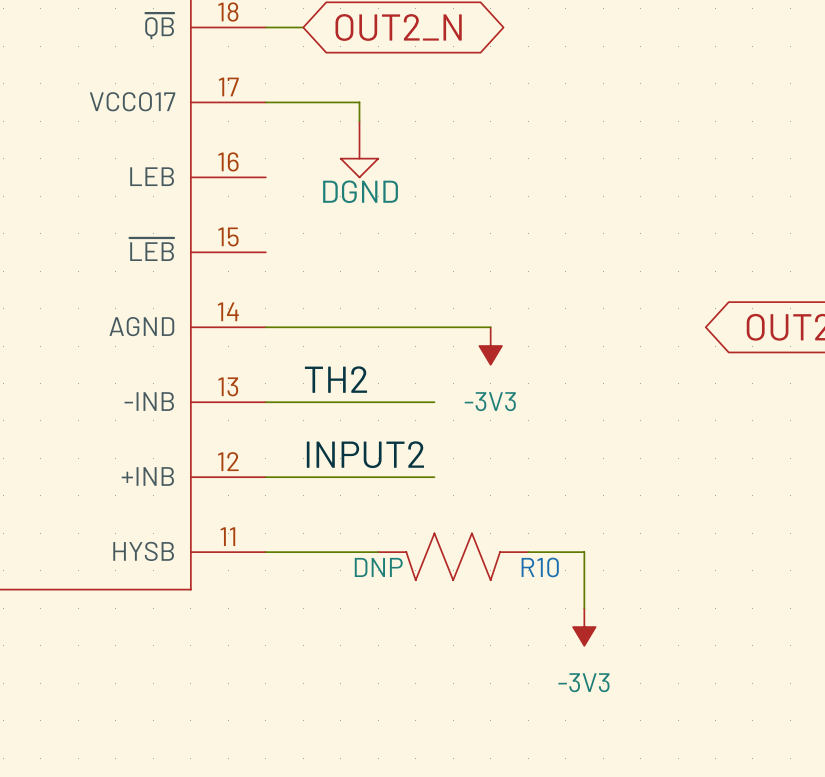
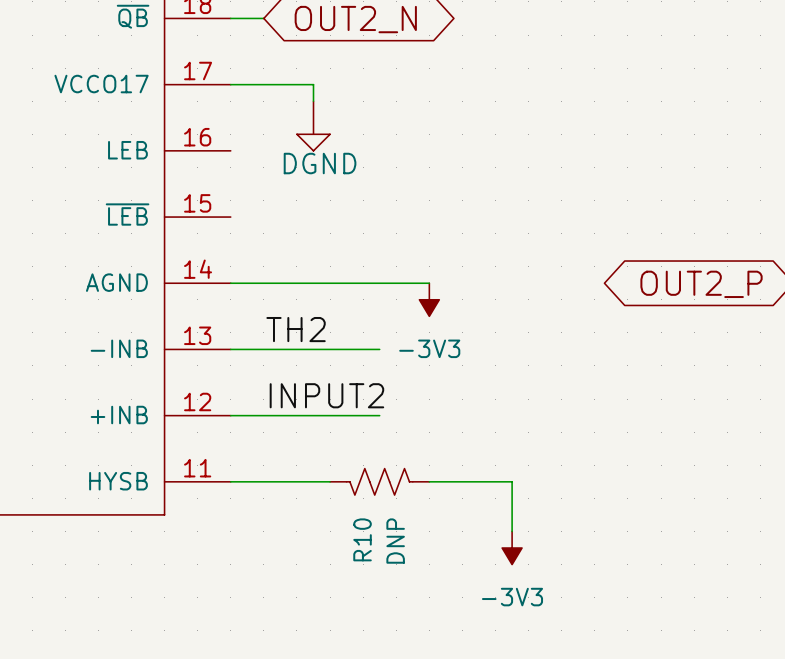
R10 symbol: [378, 533, 529, 581] -> [330, 468, 430, 496]
R10 value position: DNP (378, 567) -> DNP (395, 541)
R10 name position: R10 (540, 567) -> R10 (362, 539)

